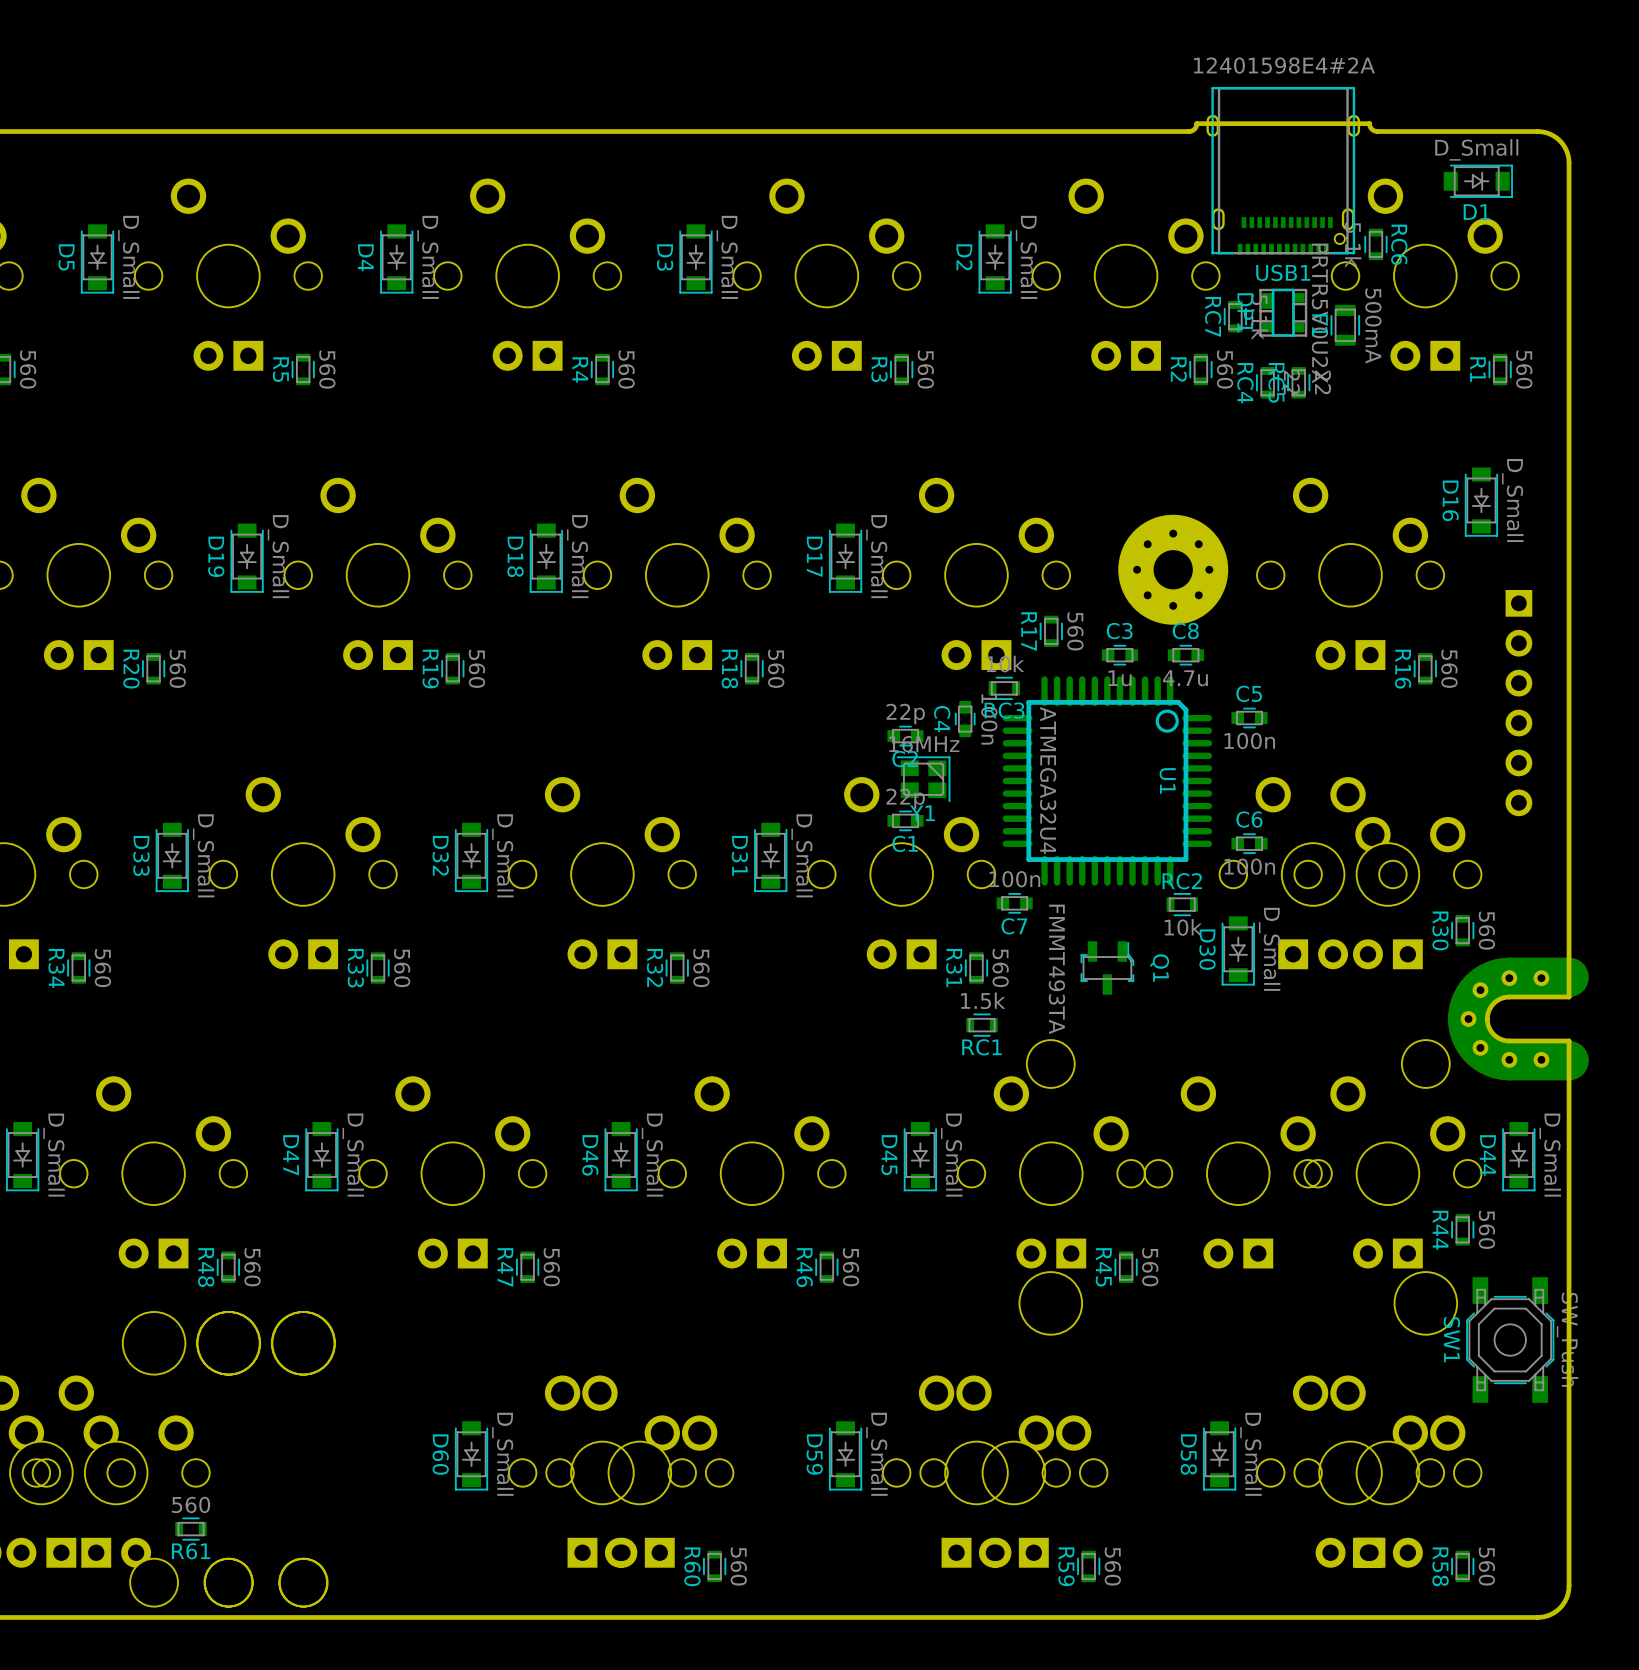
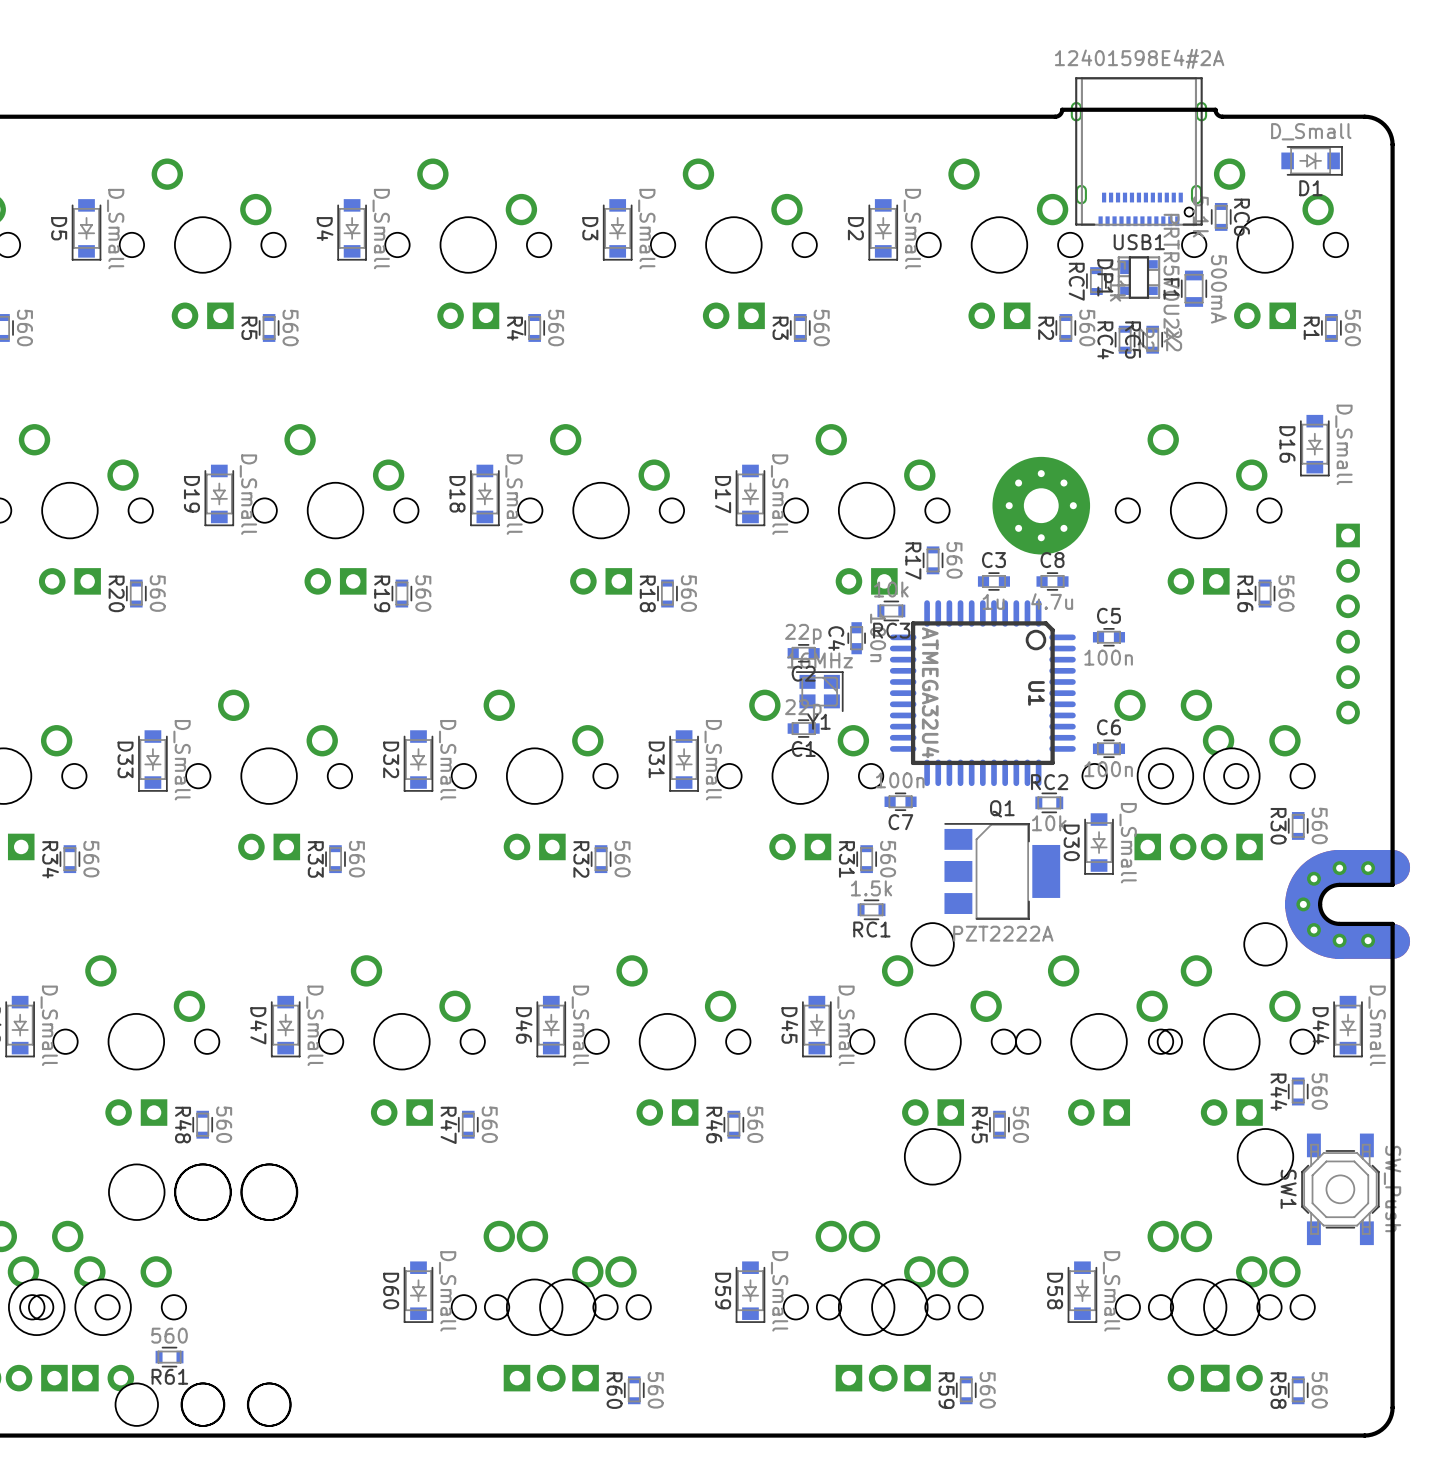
Q1 footprint: [1080, 941, 1135, 995] -> [944, 823, 1061, 920]
Q1 name position: Q1 (1159, 968) -> Q1 (1002, 808)
Q1 value: FMMT493TA (1056, 969) -> PZT2222A (1003, 933)

